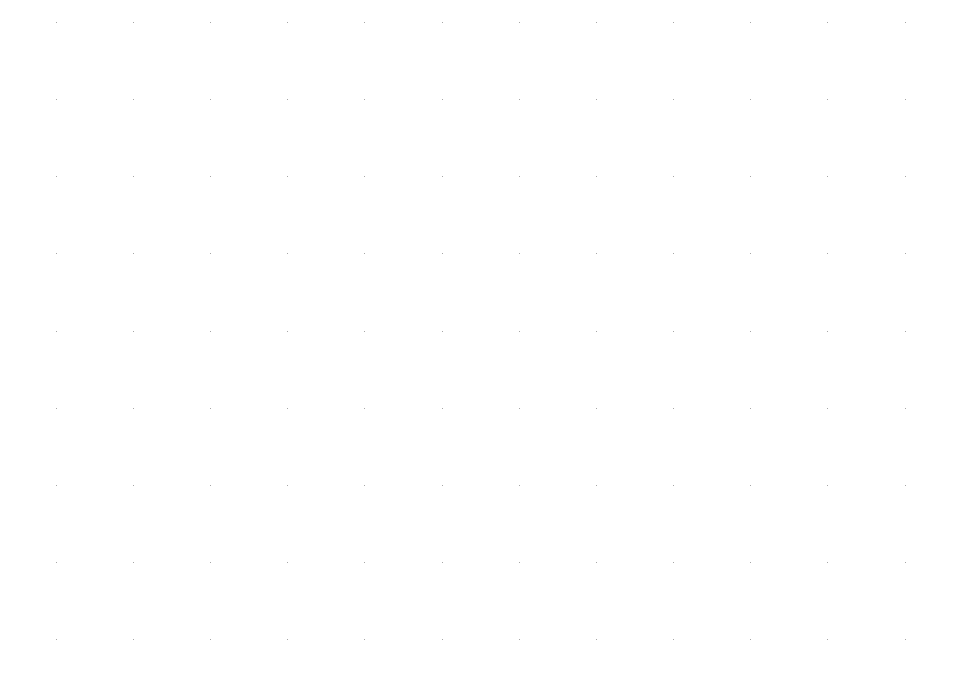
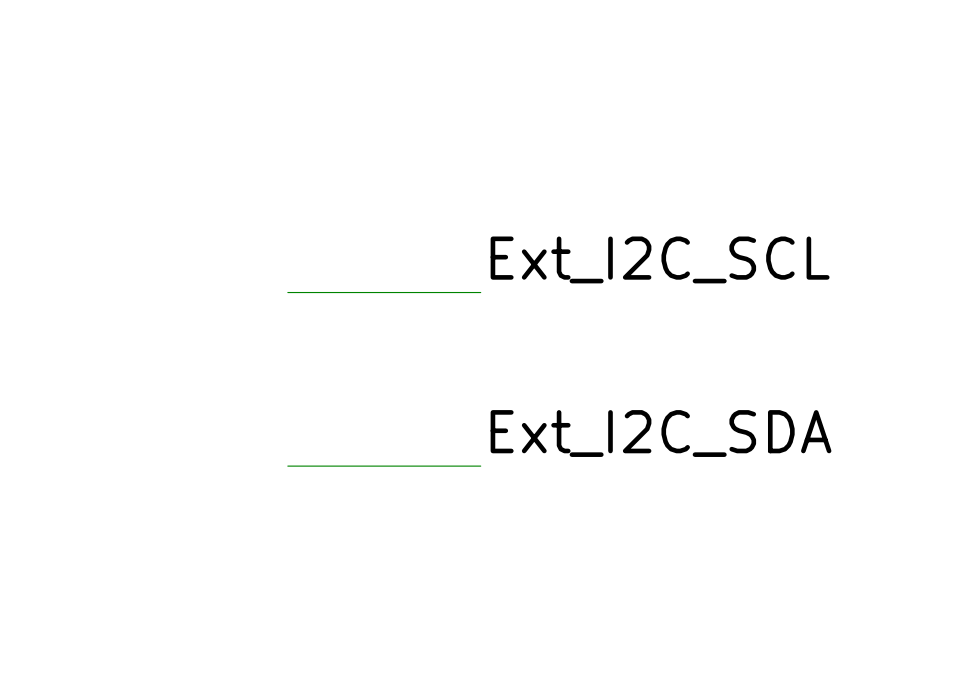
label: none -> Ext_I2C_SCL (660, 259)
wire: none -> (287, 292) (480, 292)
label: none -> Ext_I2C_SDA (661, 433)
wire: none -> (287, 466) (480, 466)

